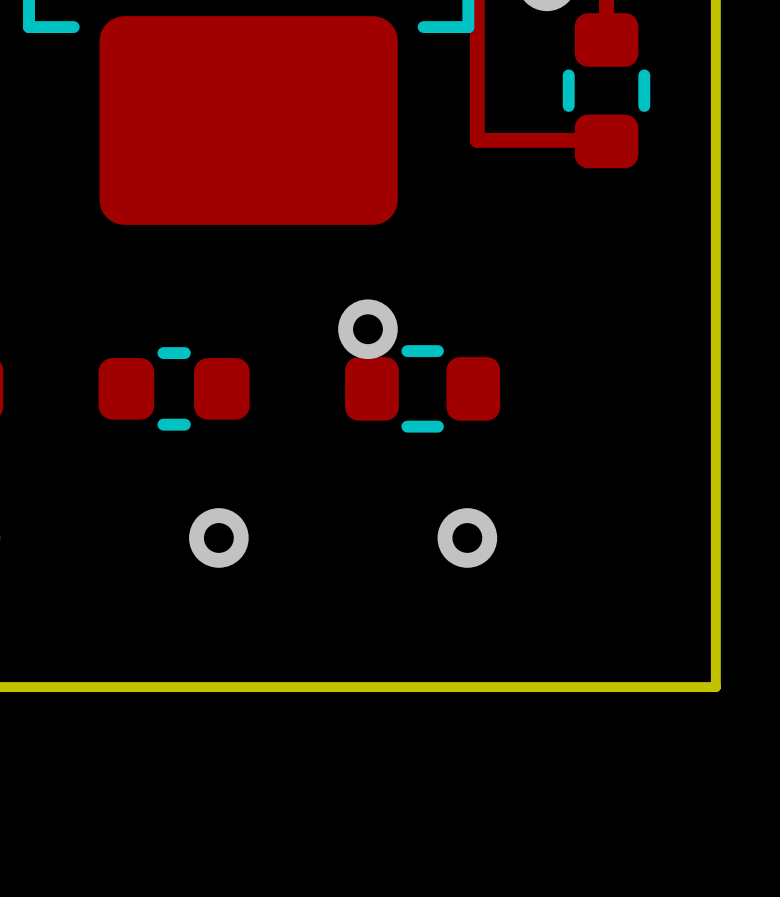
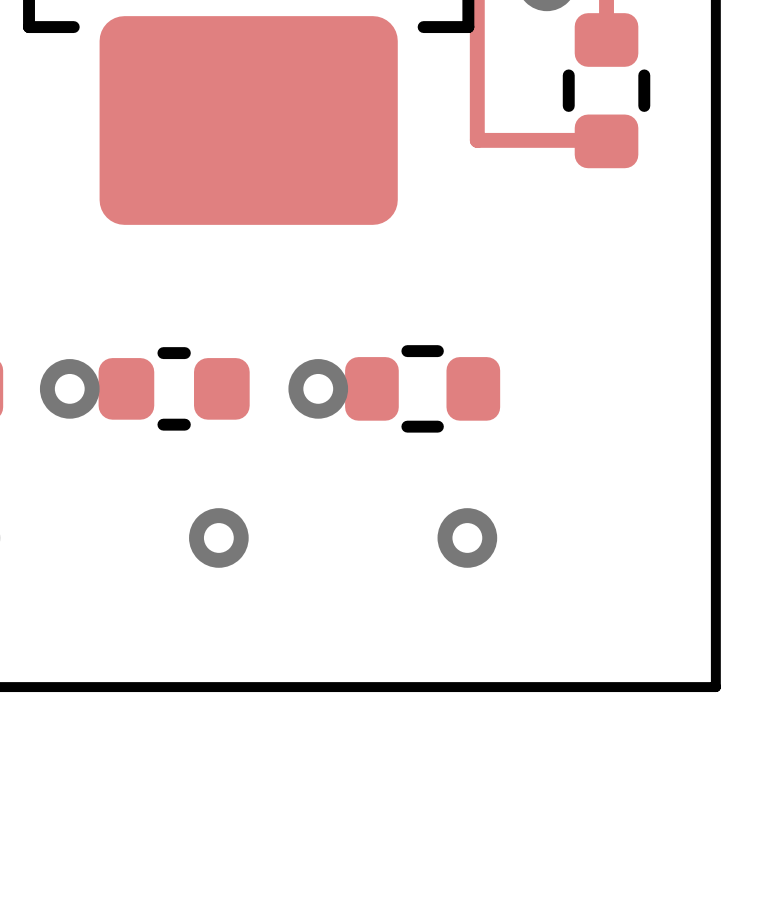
via position: (367, 329) -> (318, 388)
via: none -> (69, 388)

